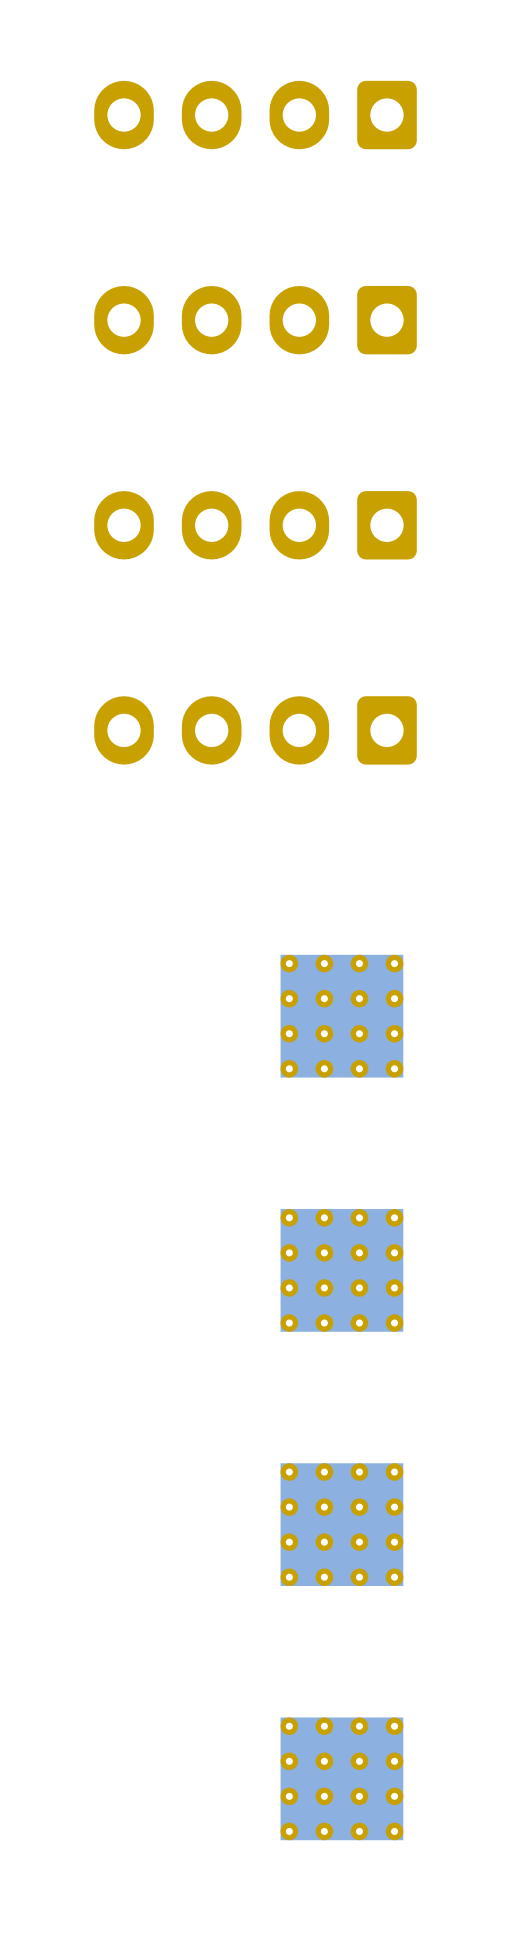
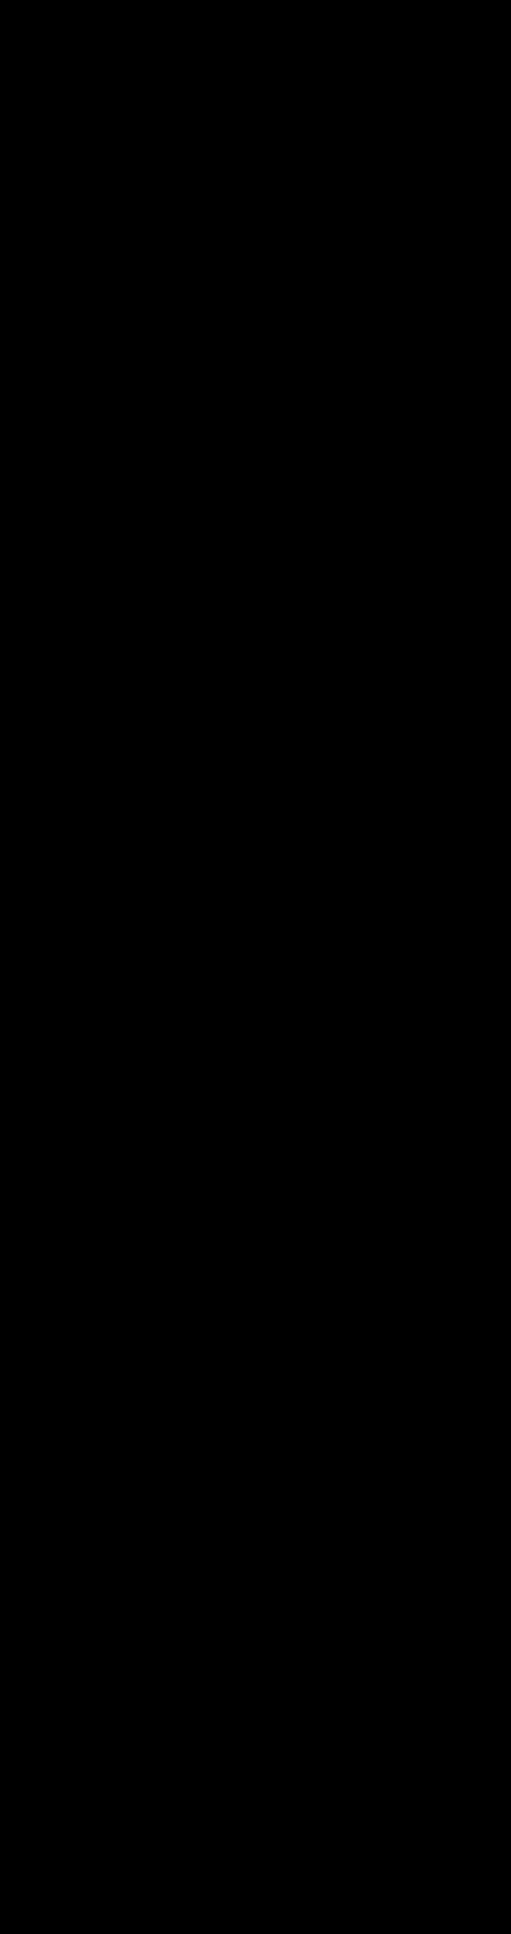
part: (255, 115) -> none
part: (255, 320) -> none
part: (255, 525) -> none
part: (255, 730) -> none
part: (341, 1016) -> none
part: (341, 1270) -> none
part: (341, 1524) -> none
part: (341, 1778) -> none

